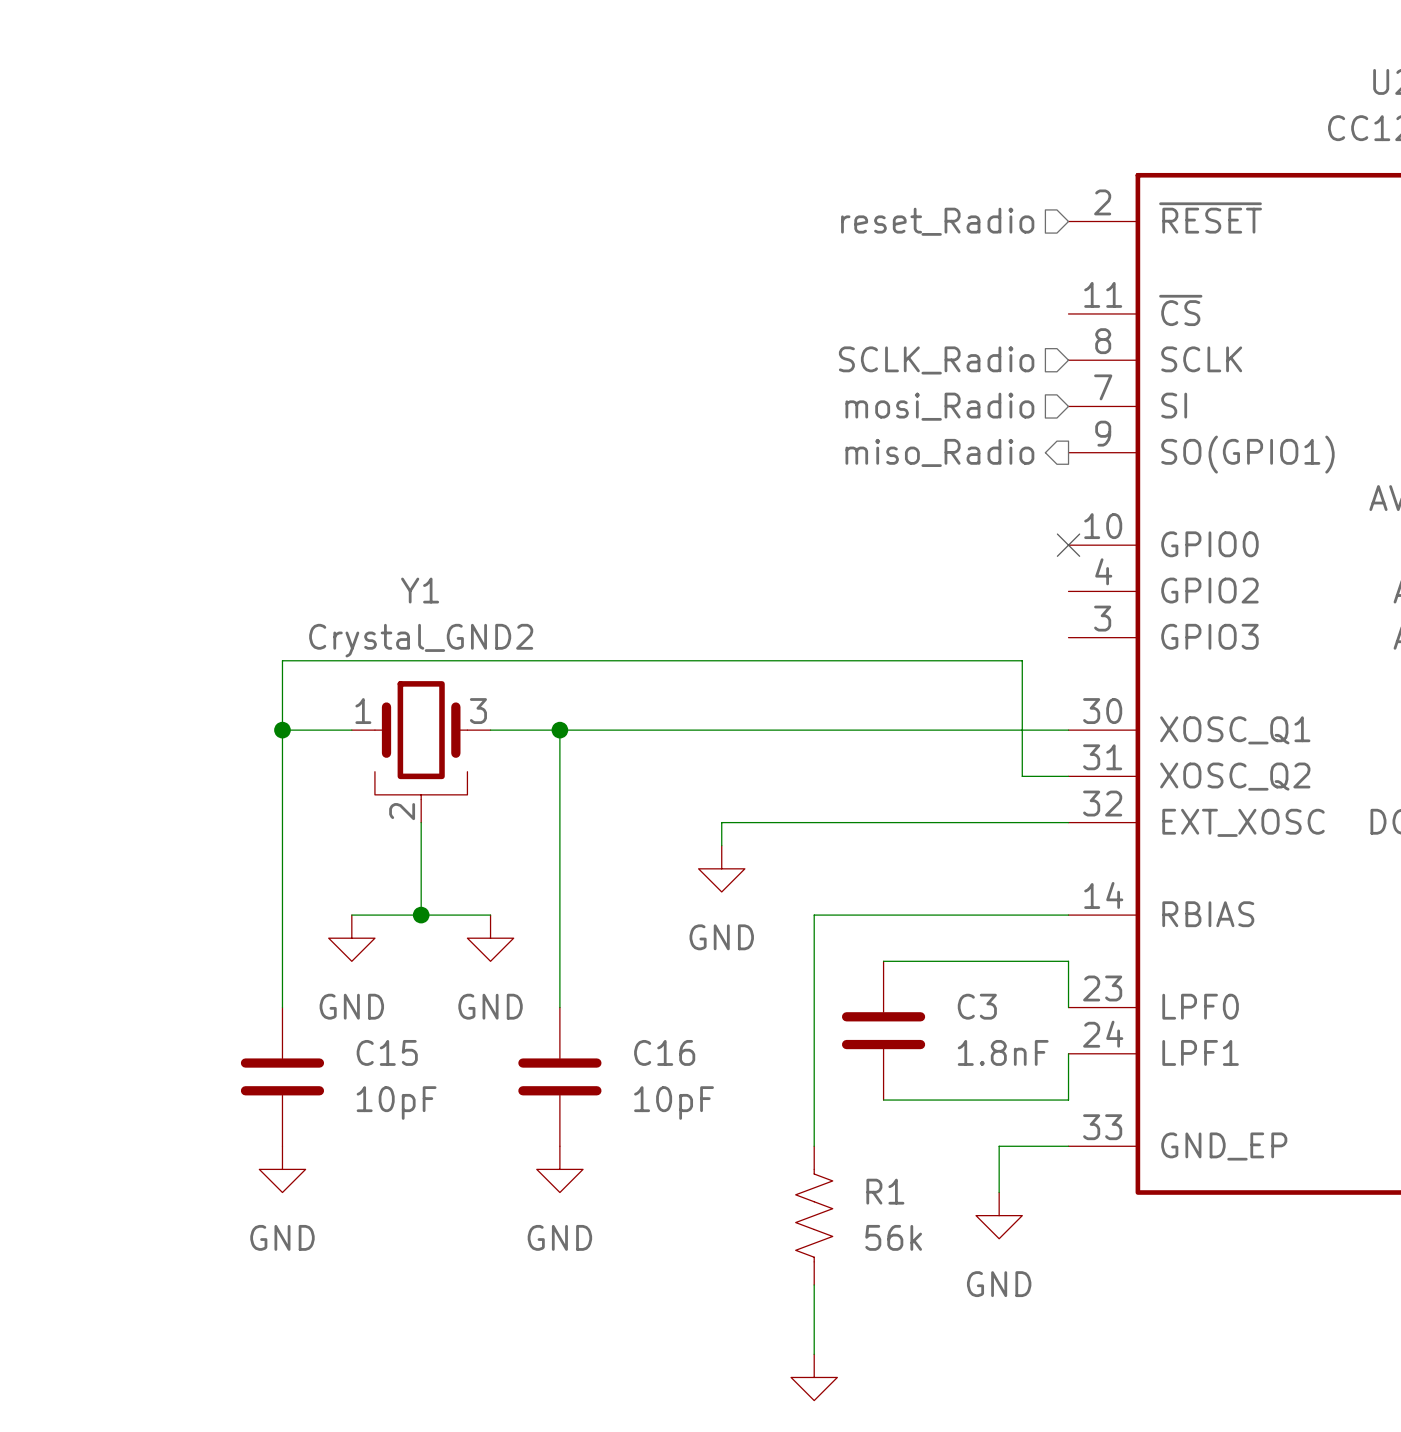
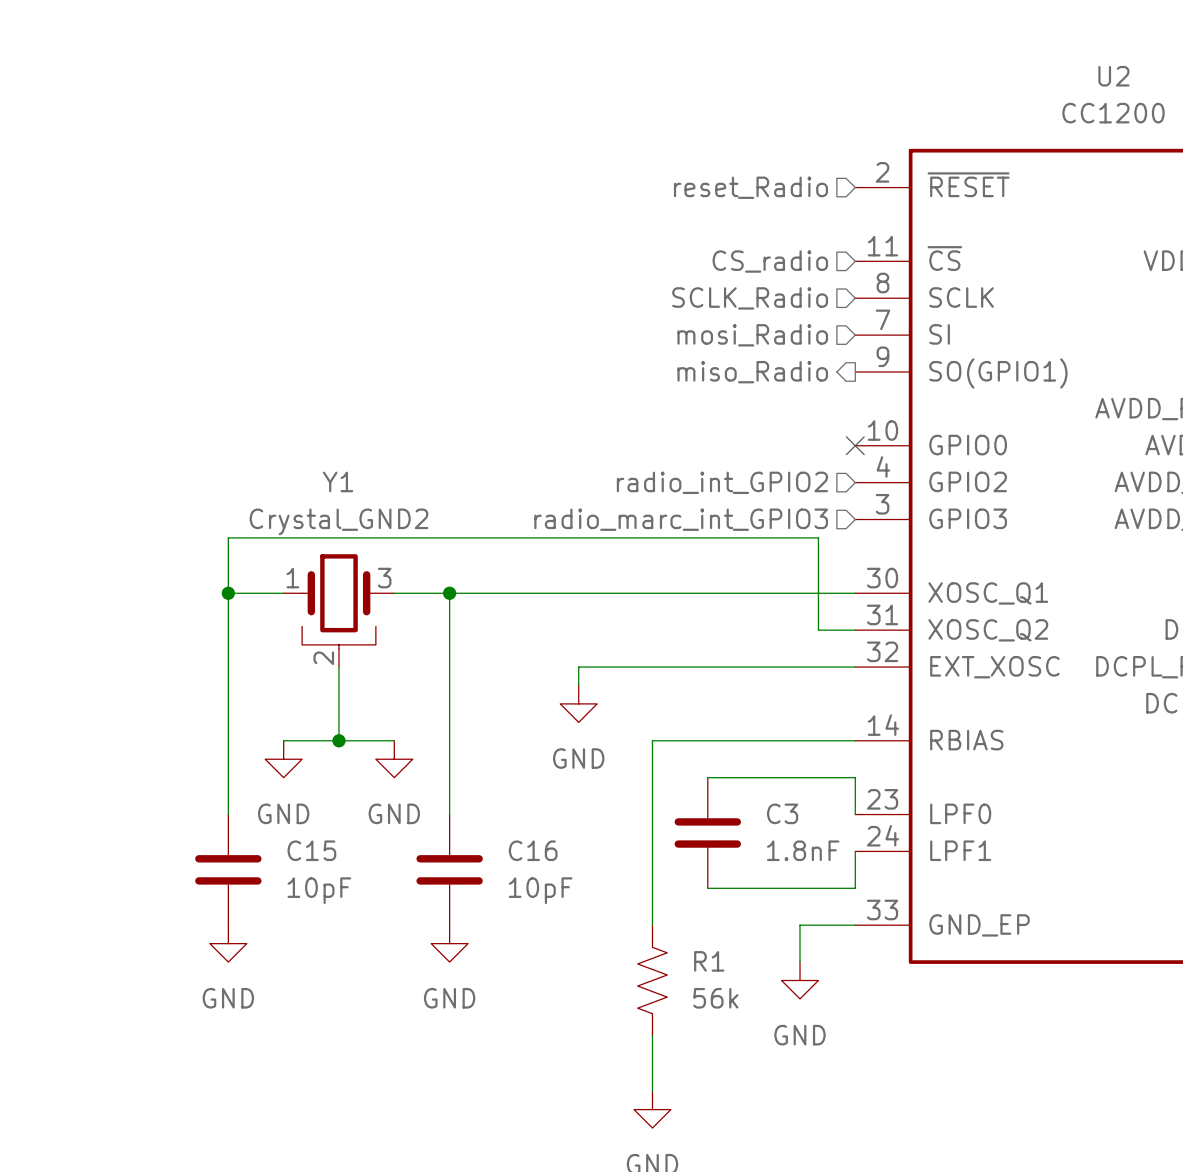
hierarchical label: none -> CS_radio (770, 261)
hierarchical label: none -> radio_int_GPIO2 (722, 482)
hierarchical label: none -> radio_marc_int_GPIO3 (681, 519)

